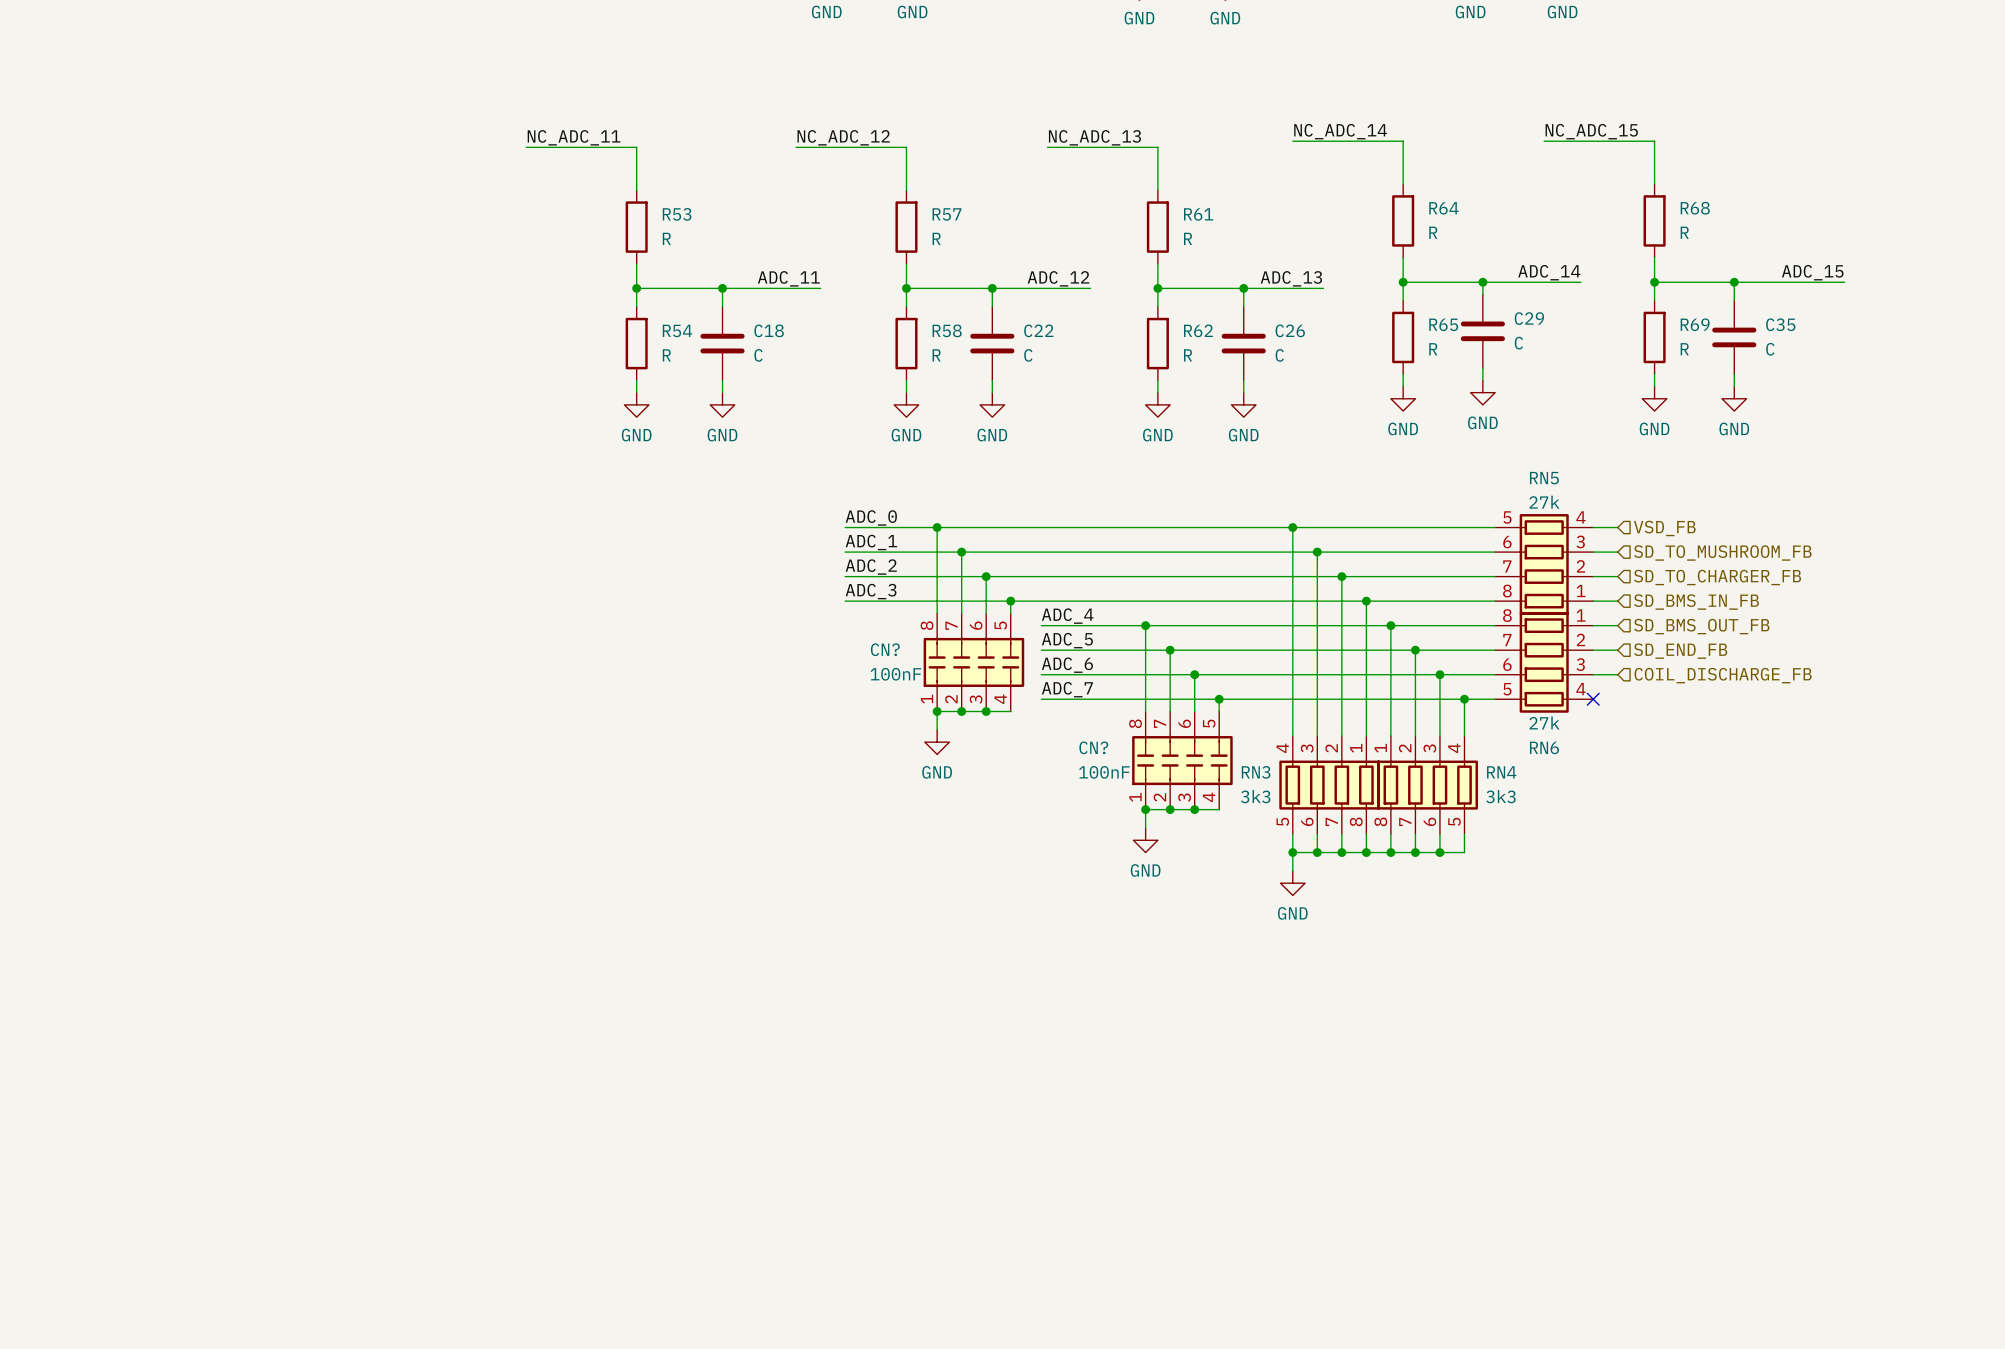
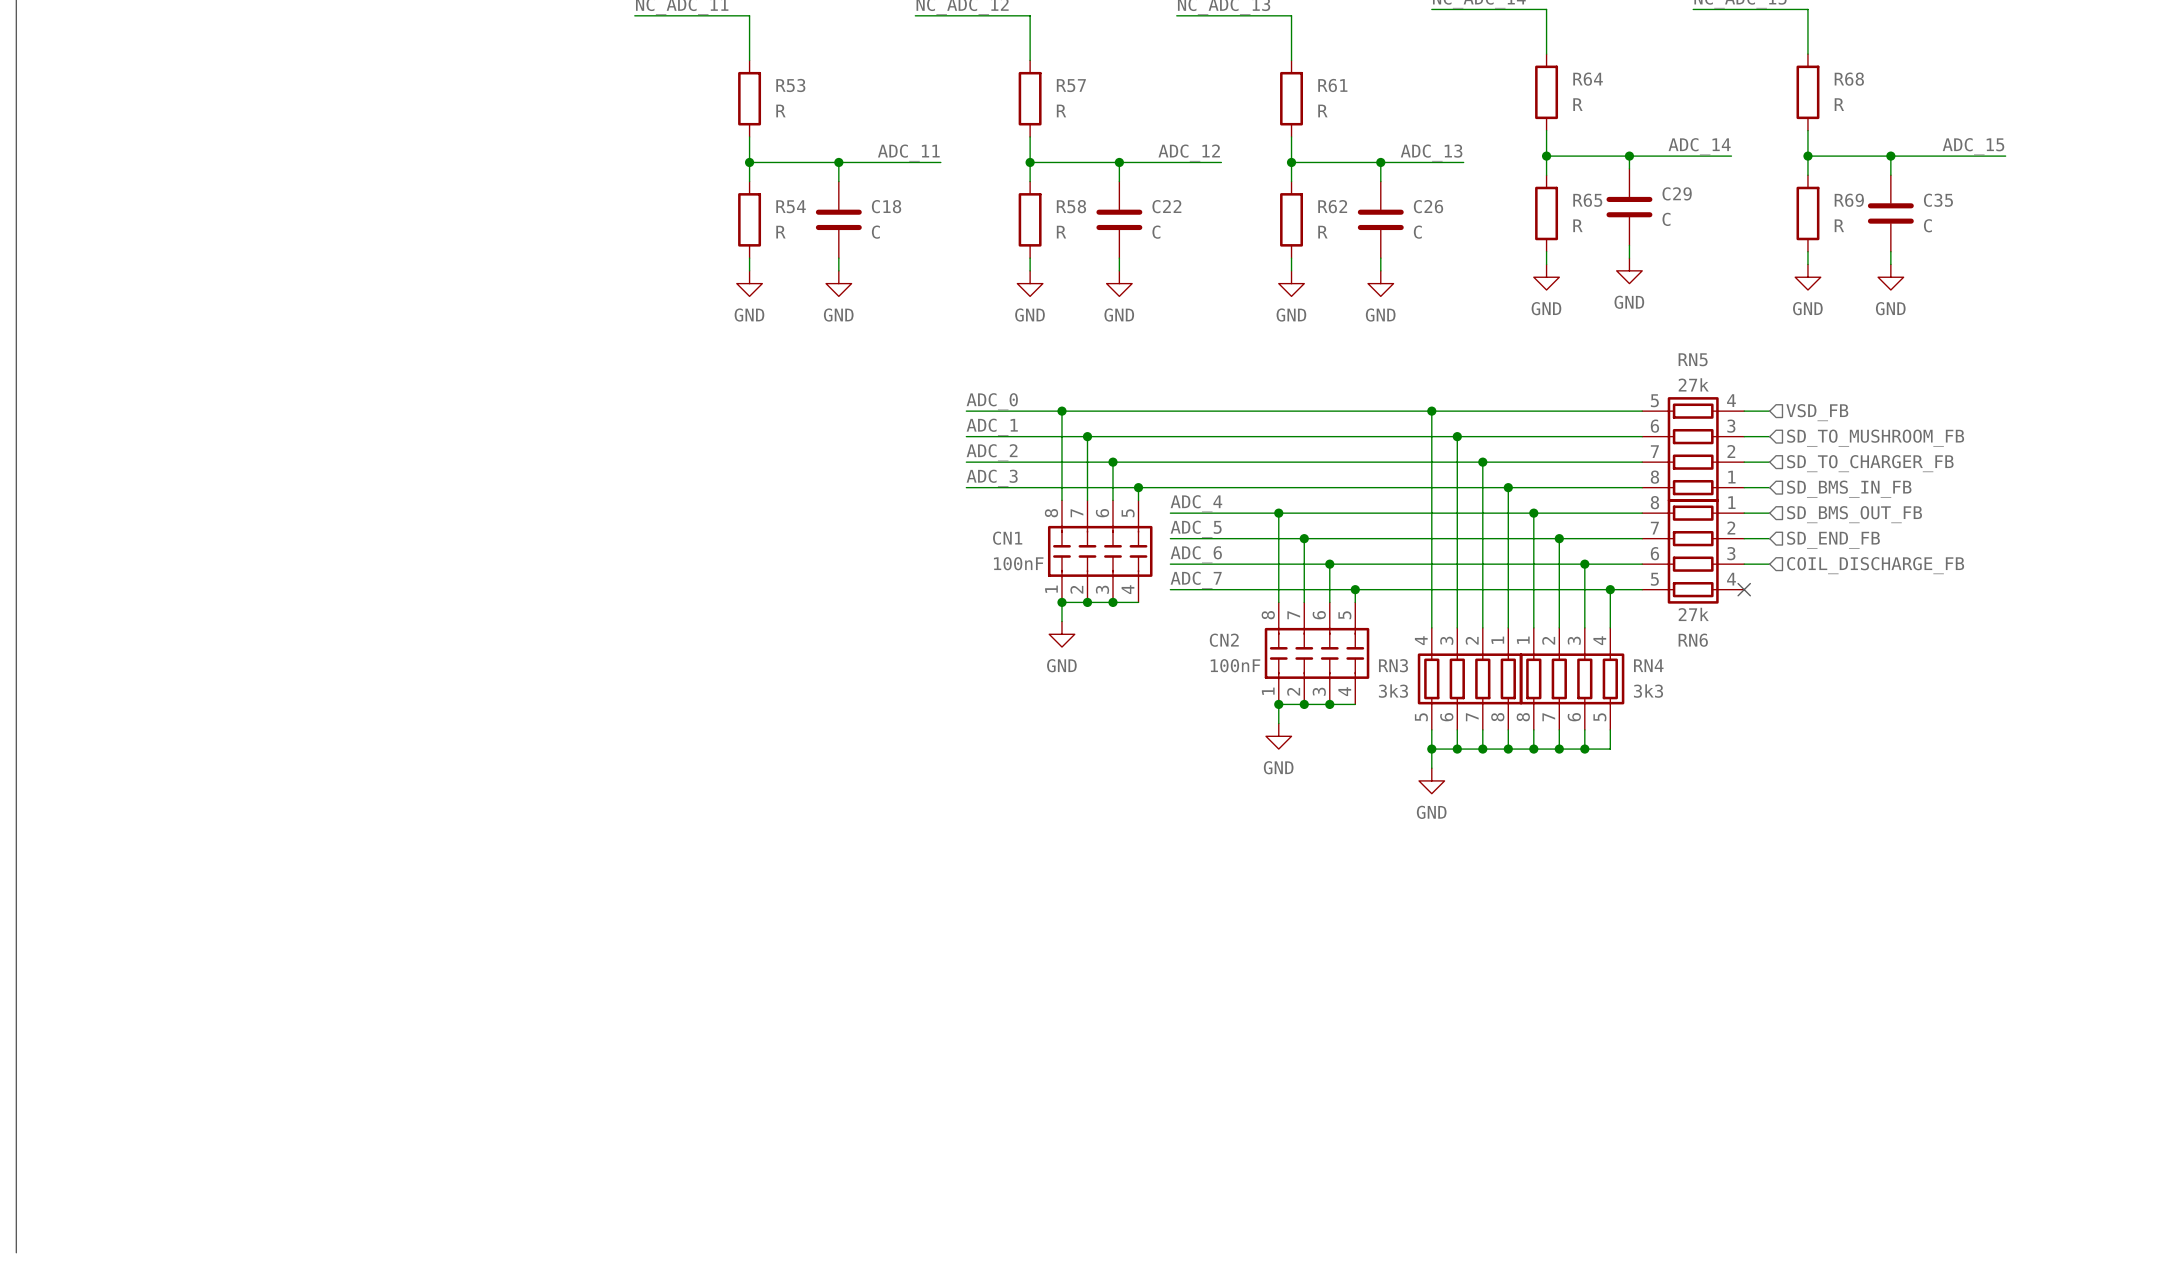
CN? name: CN? (885, 649) -> CN1 (1007, 538)
CN? name: CN? (1093, 747) -> CN2 (1224, 640)

